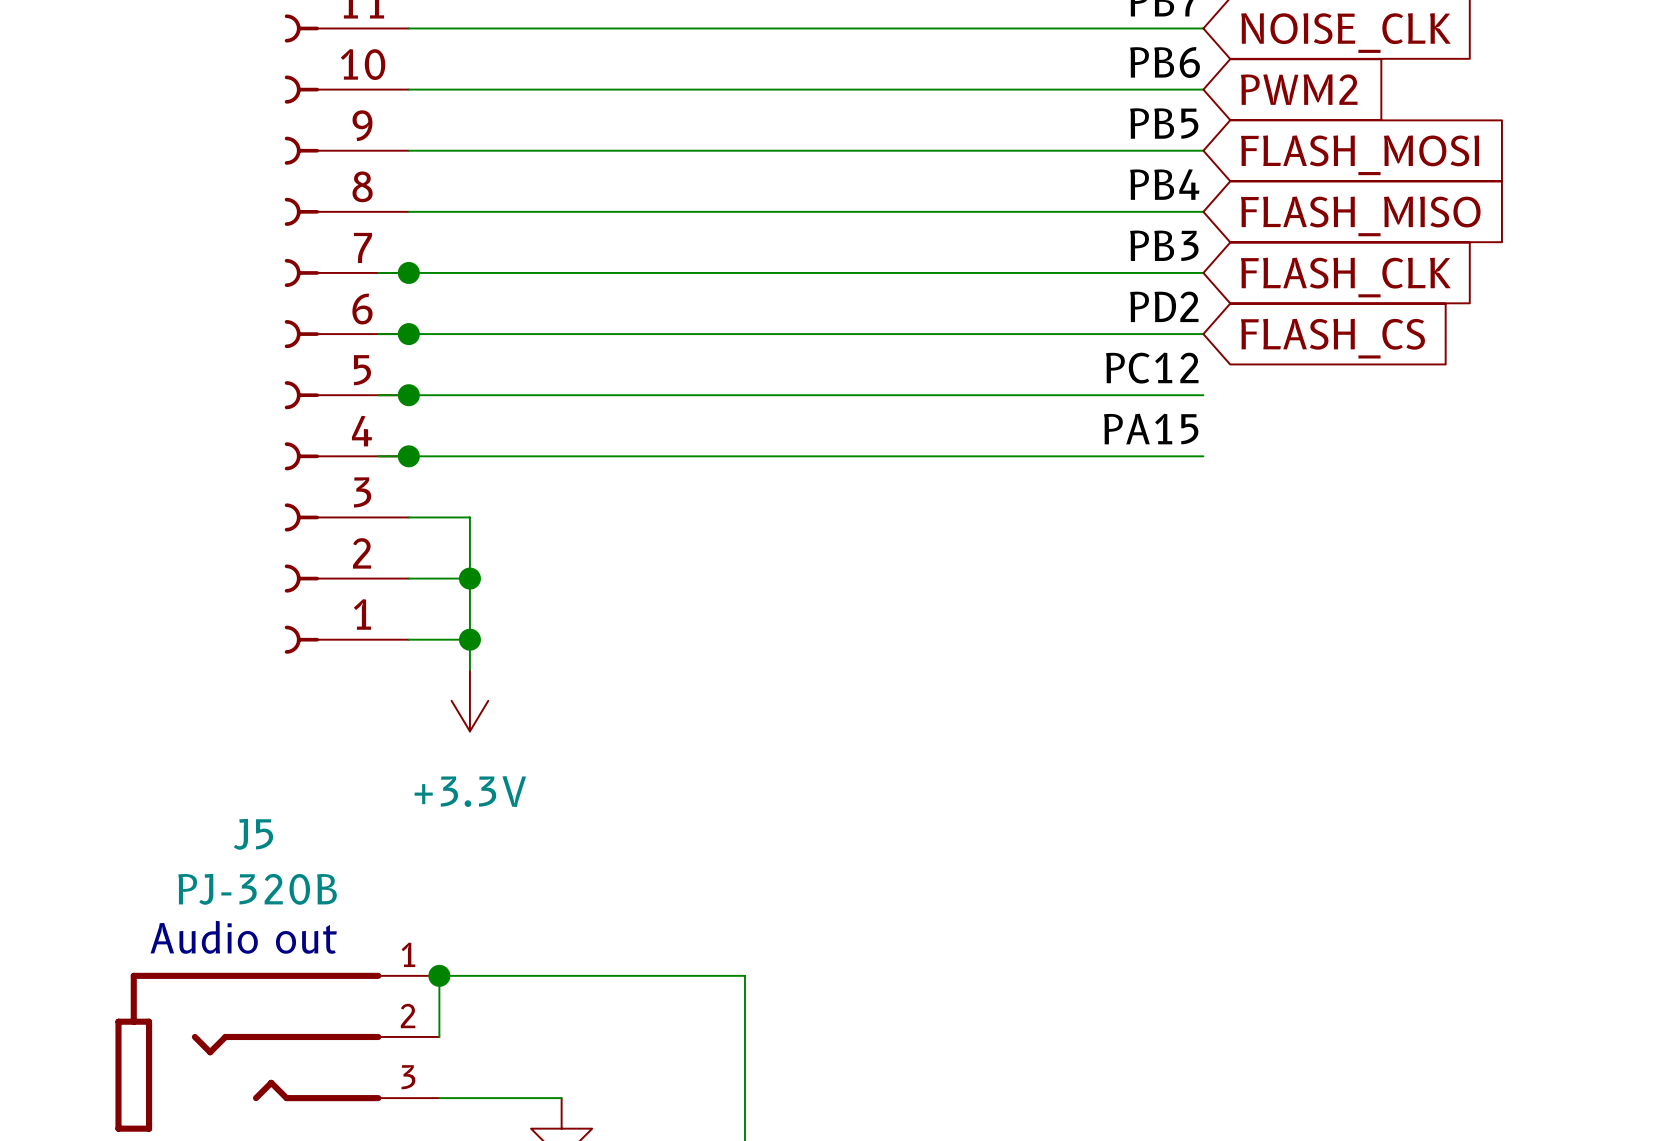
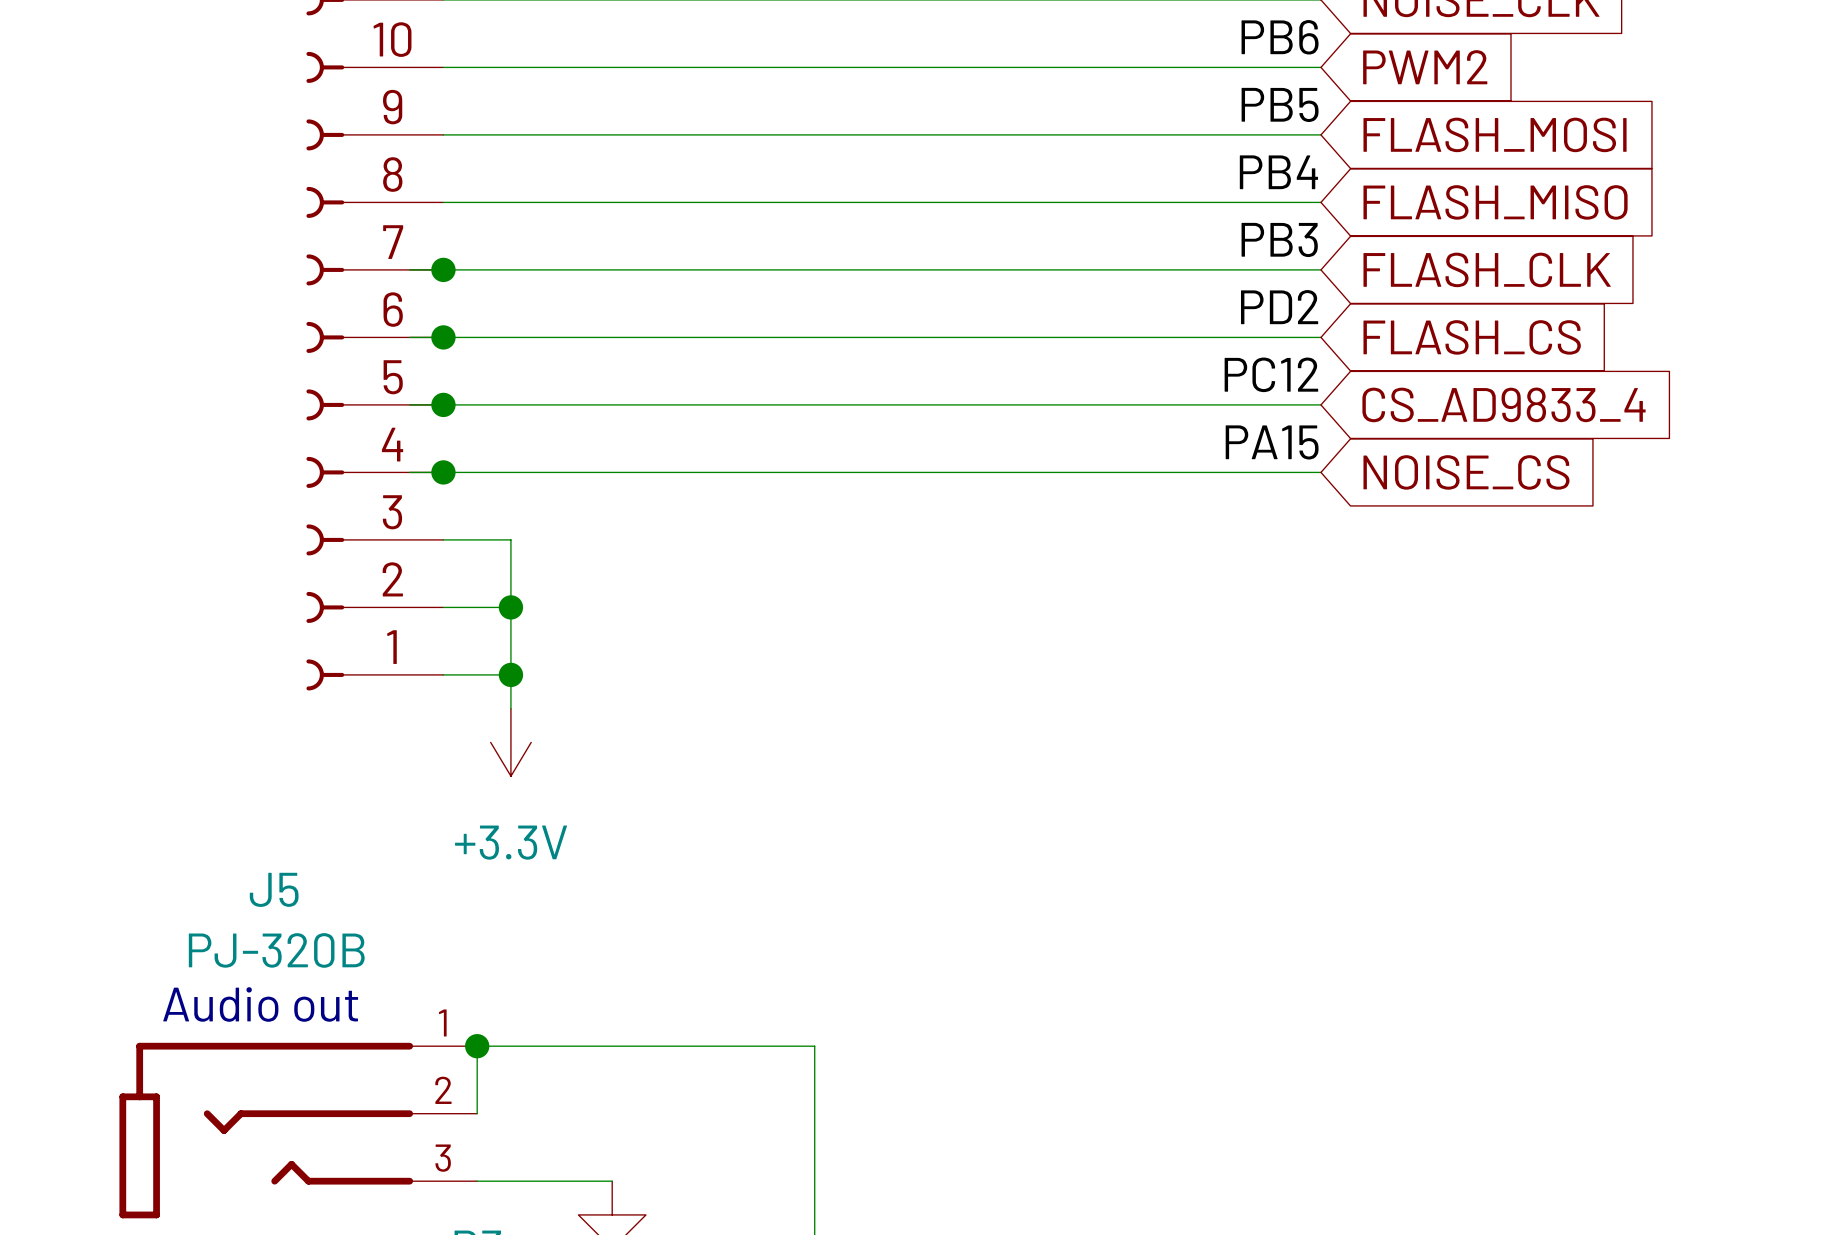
global label: none -> CS_AD9833_4 (1504, 404)
global label: none -> NOISE_CS (1466, 472)

